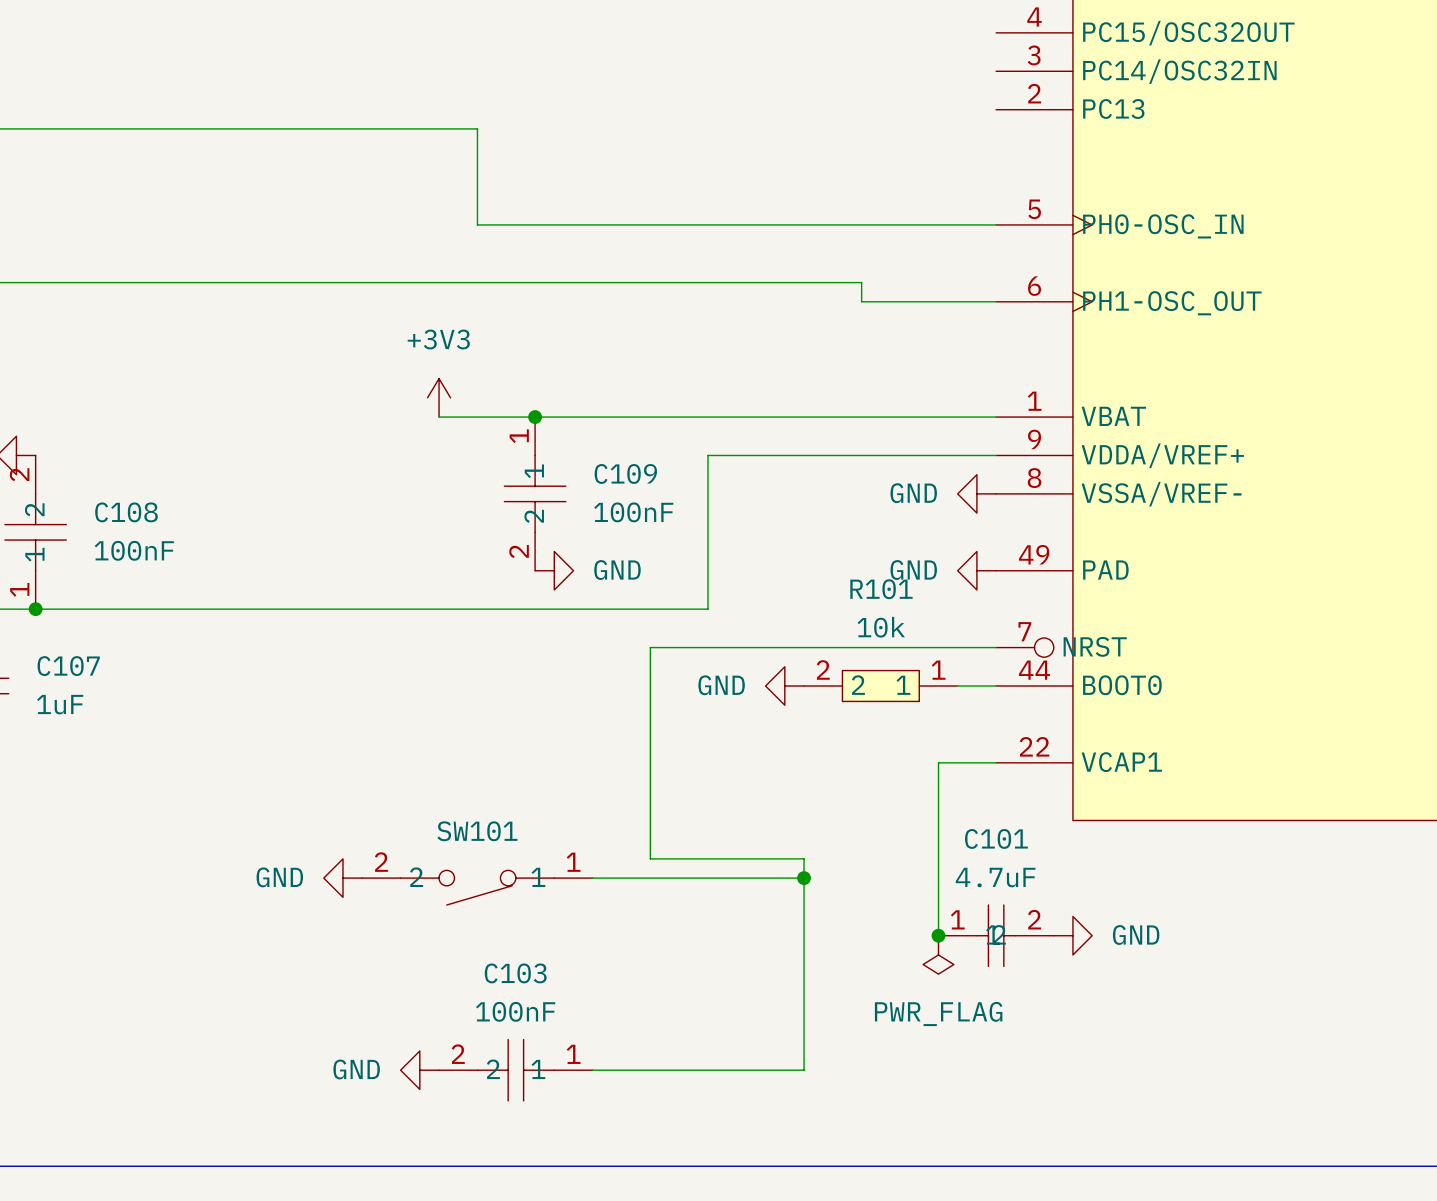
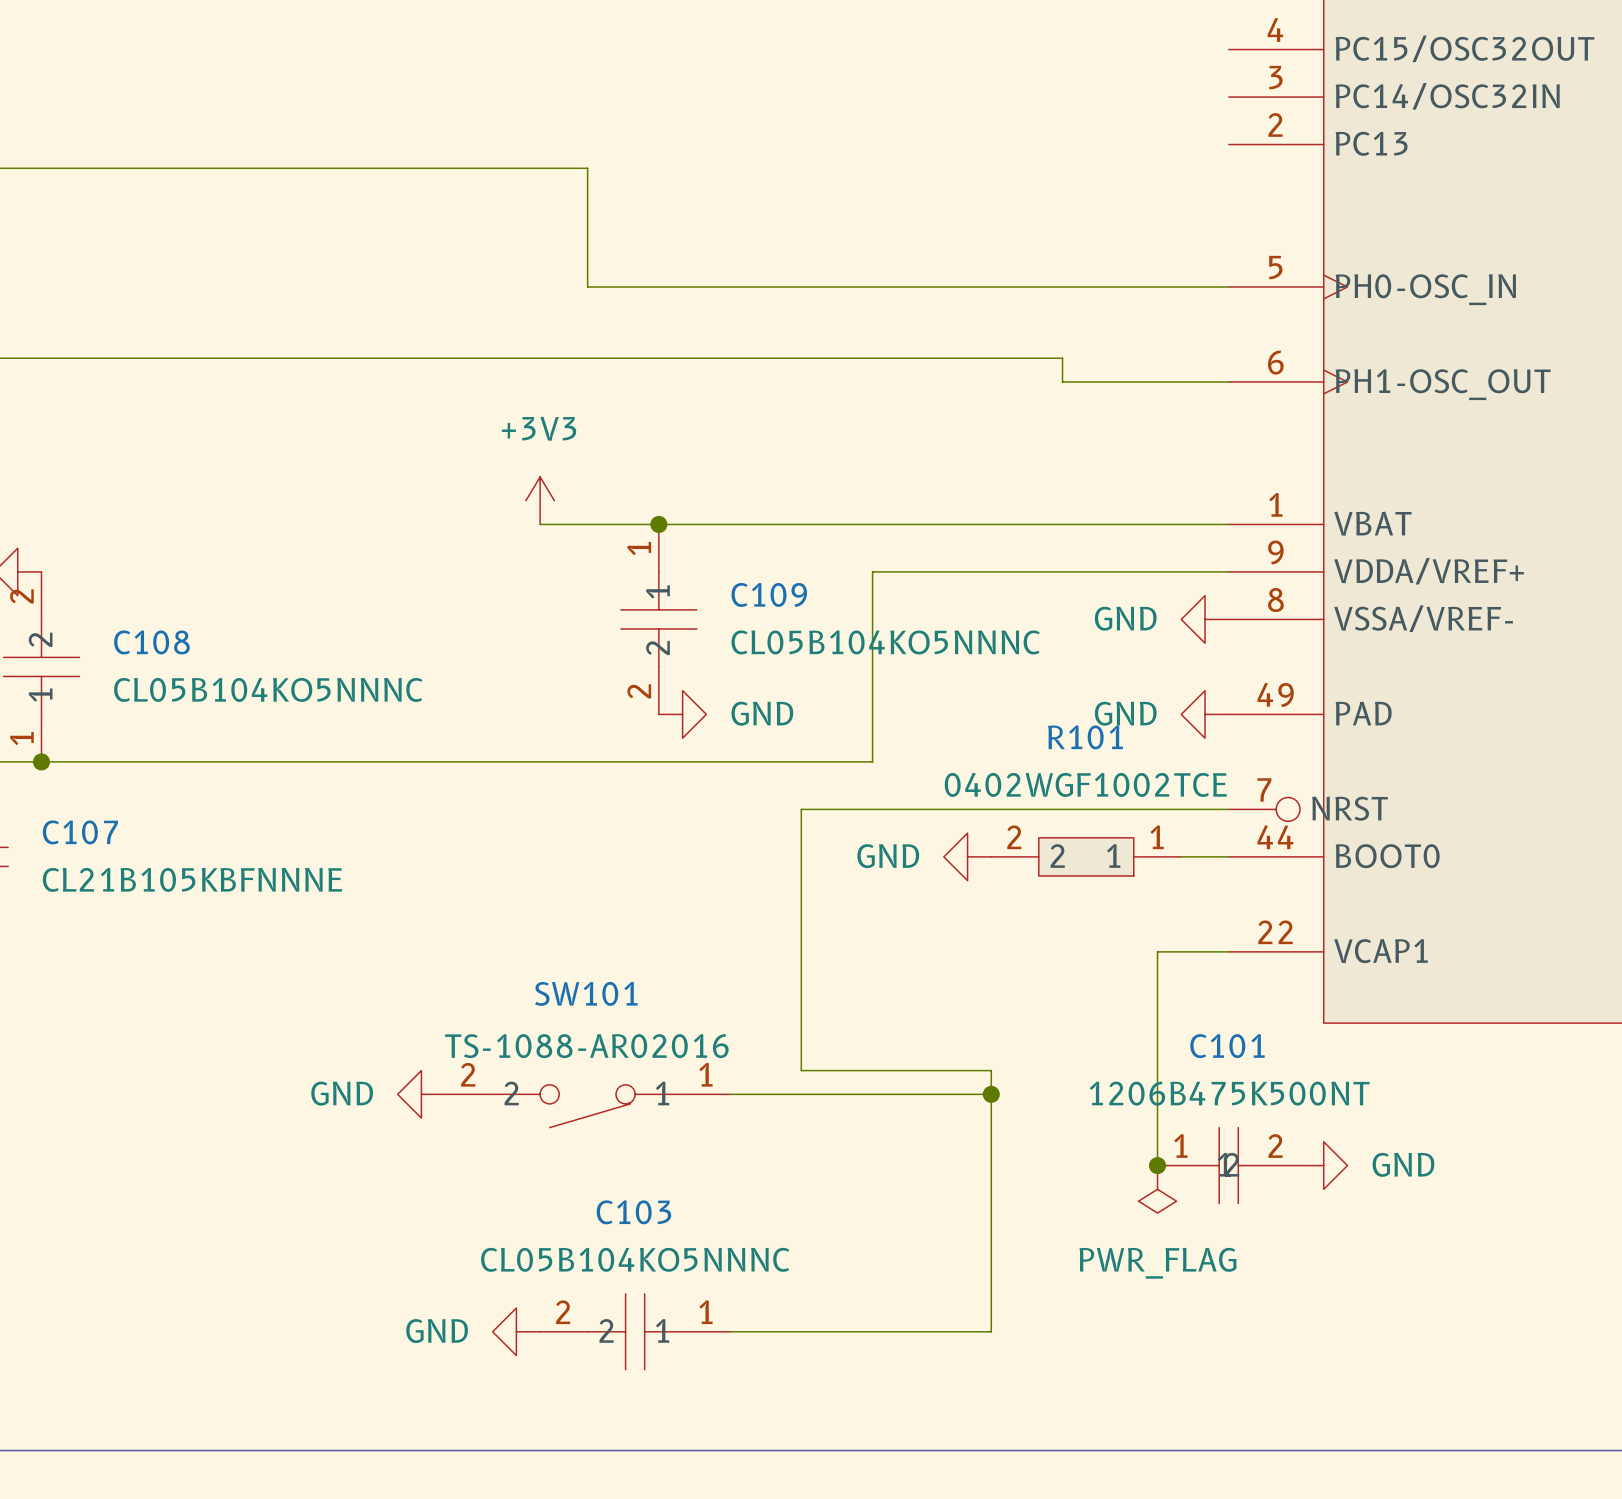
C109 value: 100nF (633, 512) -> CL05B104KO5NNNC (885, 642)
C108 value: 100nF (134, 550) -> CL05B104KO5NNNC (268, 689)
R101 value: 10k (881, 627) -> 0402WGF1002TCE (1085, 784)
C107 value: 1uF (60, 704) -> CL21B105KBFNNNE (192, 879)
SW101 name position: SW101 (477, 831) -> SW101 (586, 993)
SW101 value: none -> TS-1088-AR02016 (586, 1046)
C101 value: 4.7uF (995, 877) -> 1206B475K500NT (1229, 1093)
C103 value: 100nF (515, 1011) -> CL05B104KO5NNNC (635, 1259)

